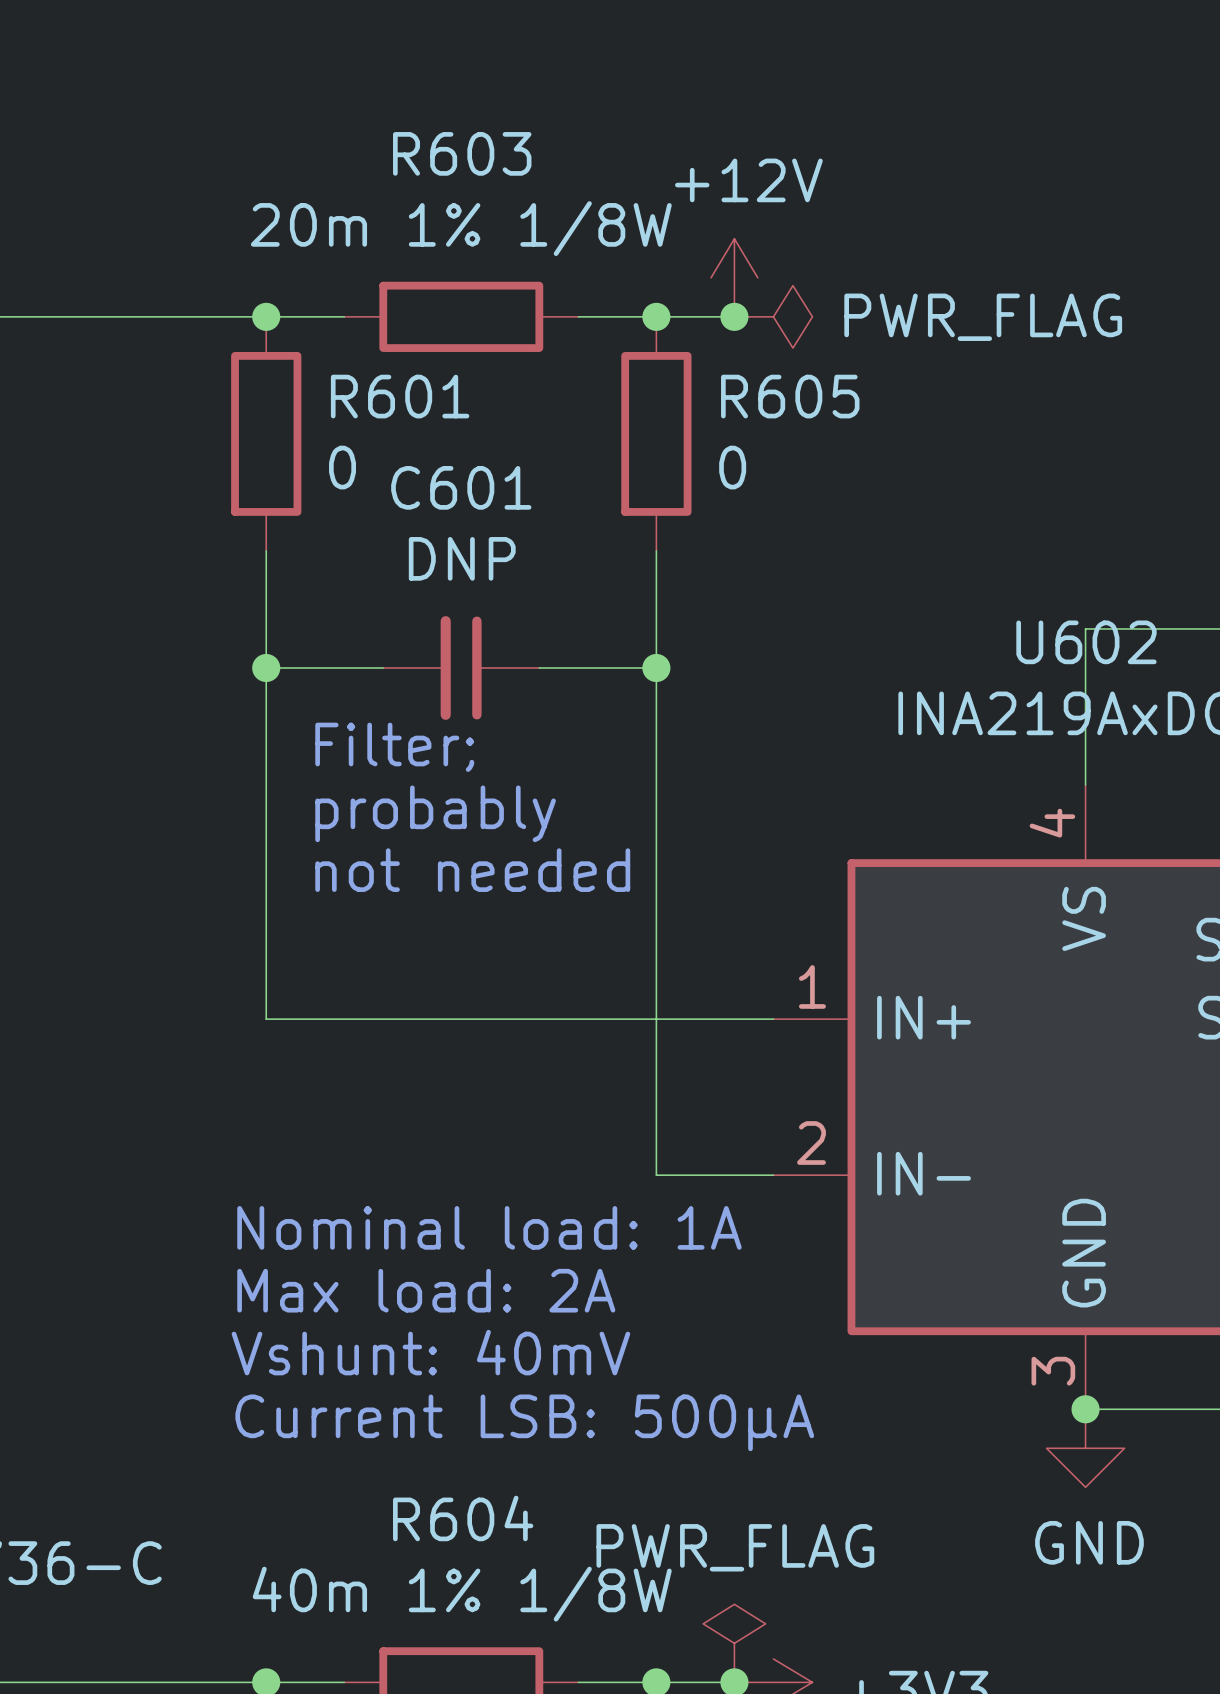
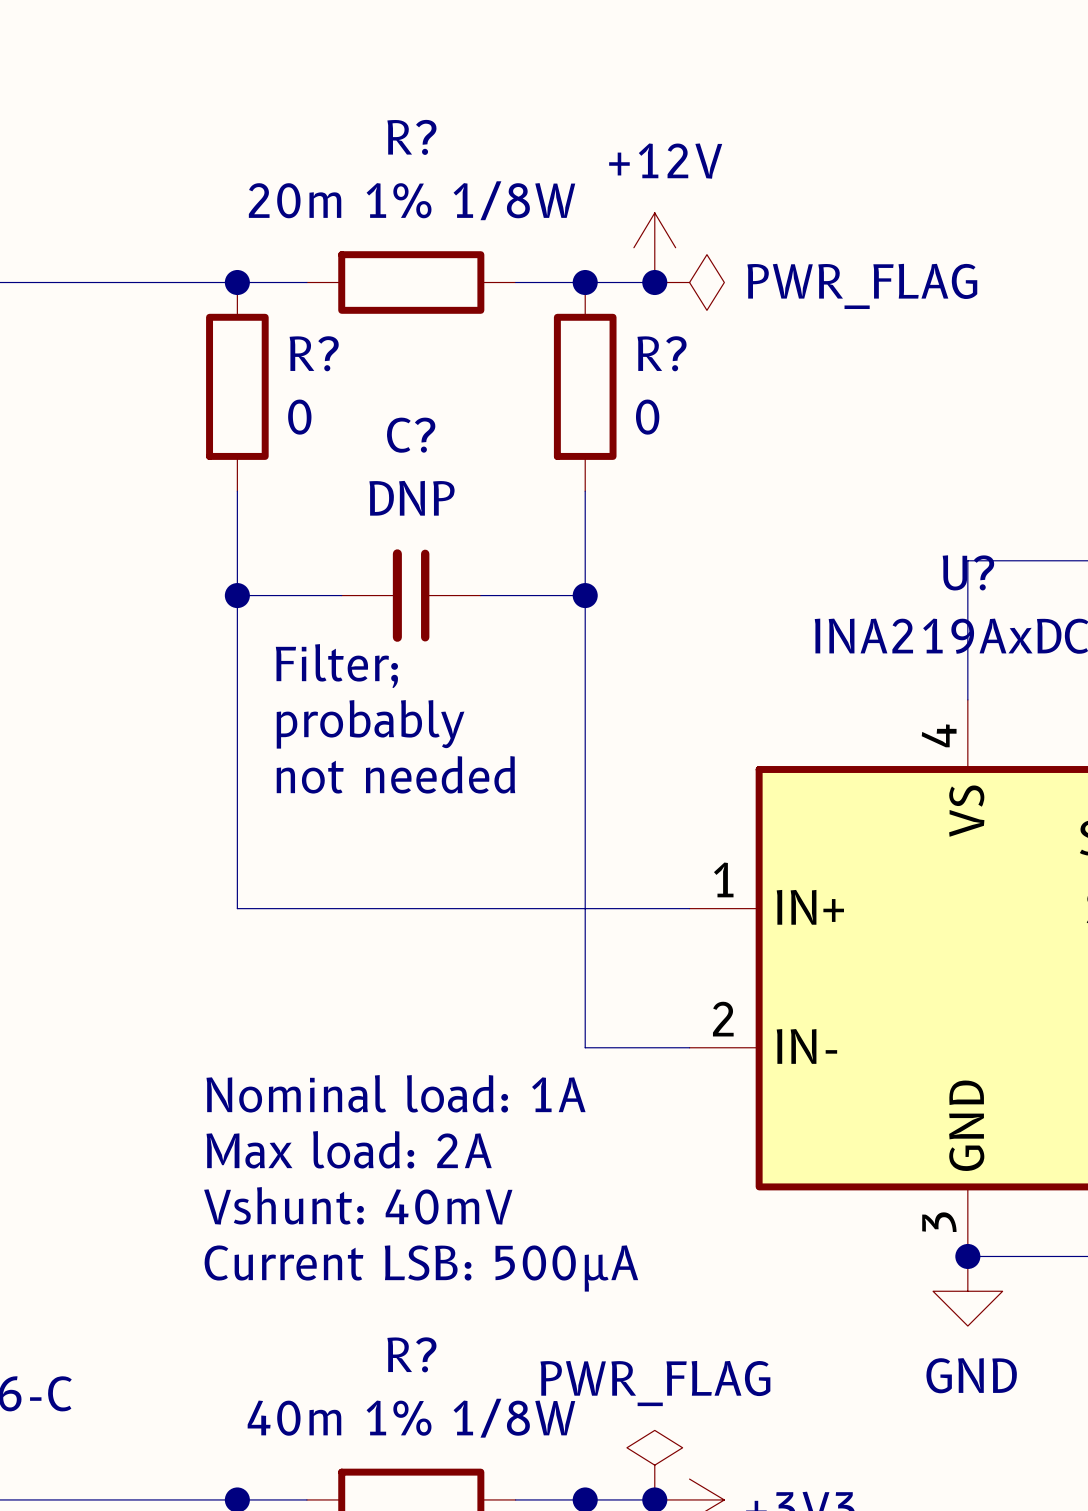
R603 name: R603 (462, 153) -> R? (411, 137)
R601 name: R601 (400, 396) -> R? (314, 353)
R605 name: R605 (790, 396) -> R? (662, 353)
C601 name: C601 (461, 487) -> C? (411, 435)
U602 name: U602 (1086, 642) -> U? (968, 572)
R604 name: R604 (463, 1518) -> R? (411, 1354)

